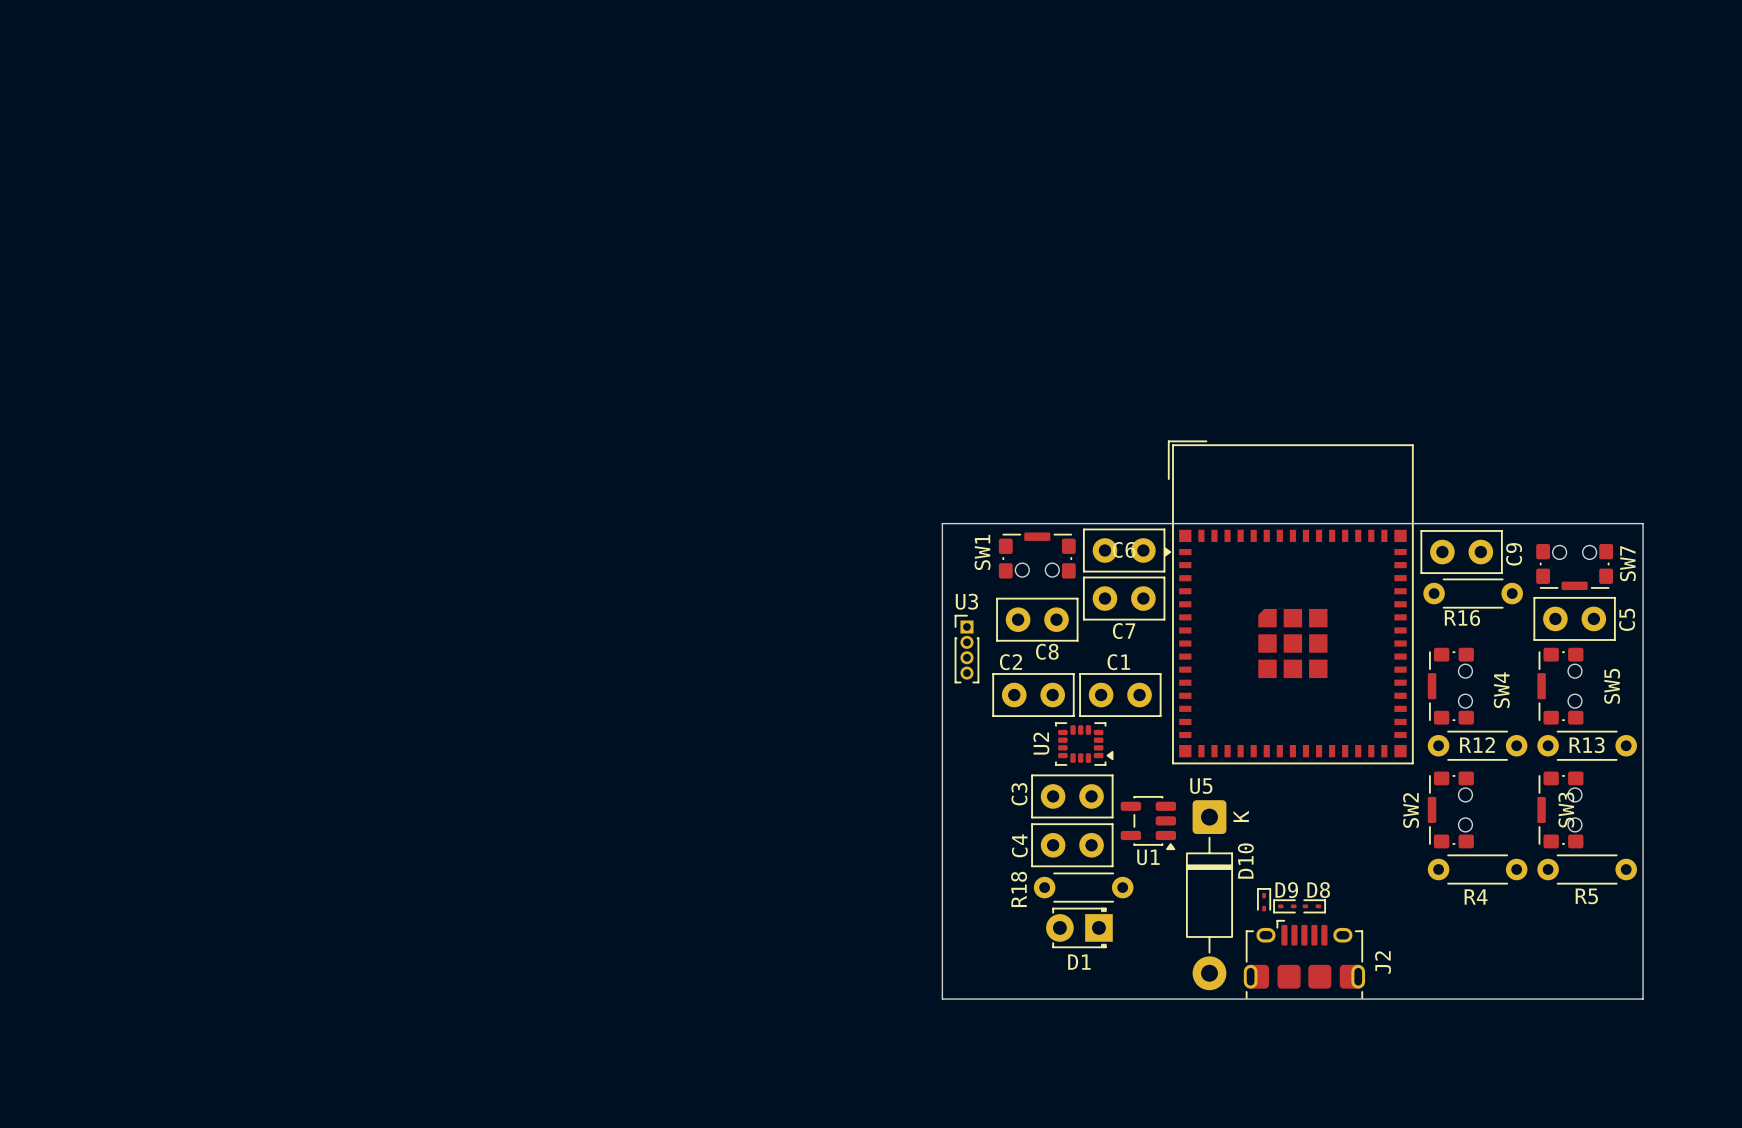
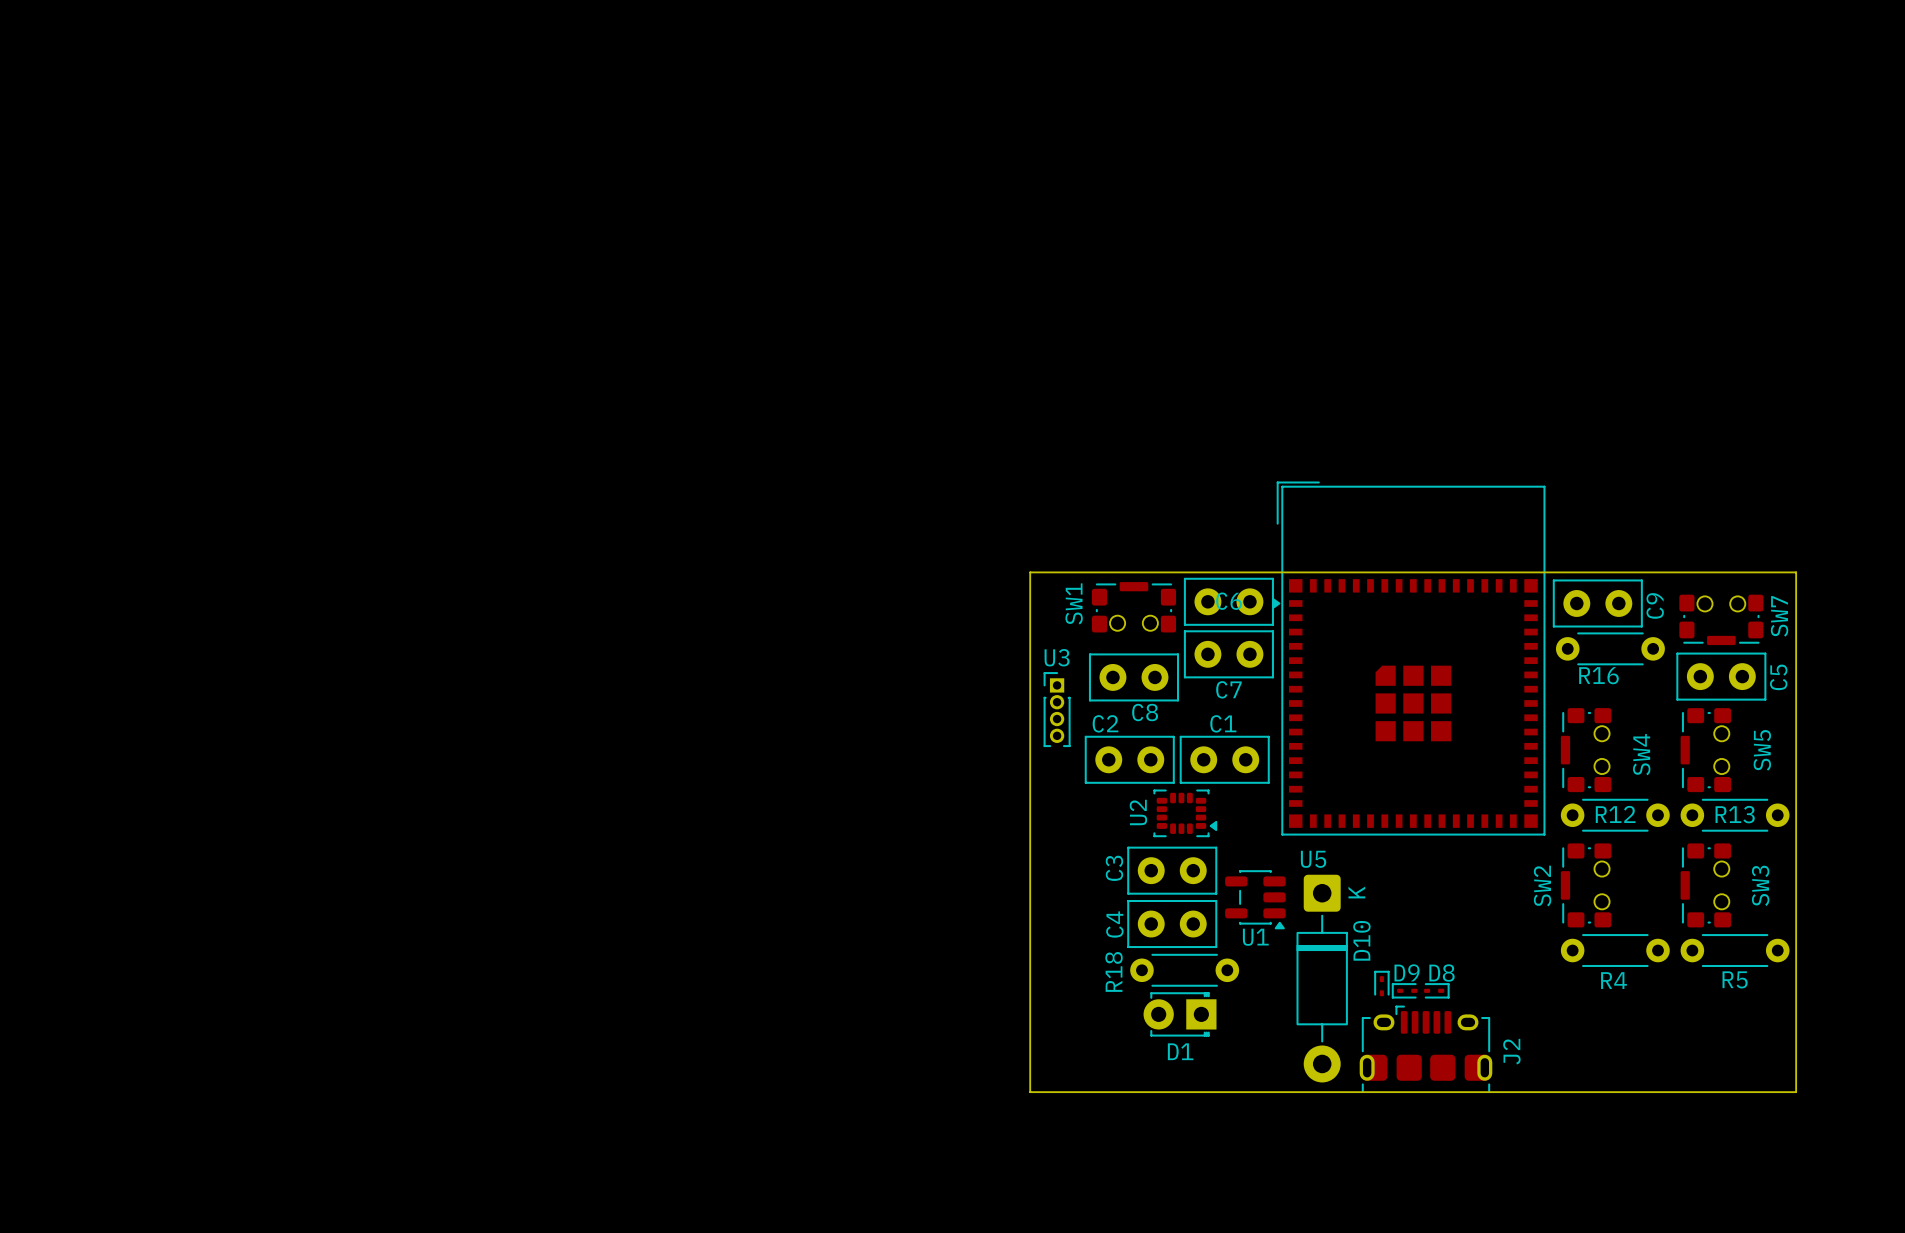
SW3 name position: SW3 (1566, 810) -> SW3 (1760, 885)

